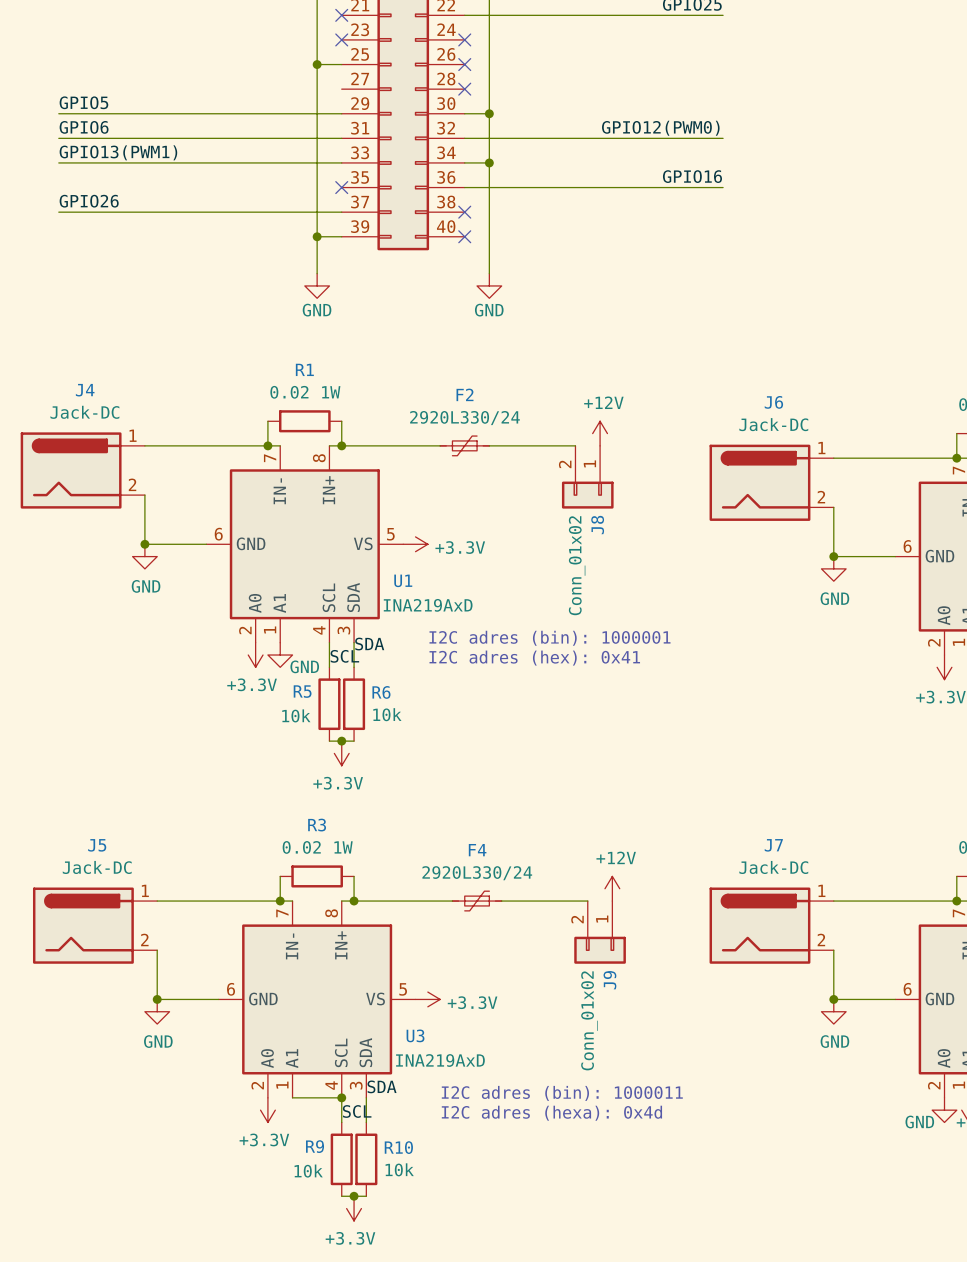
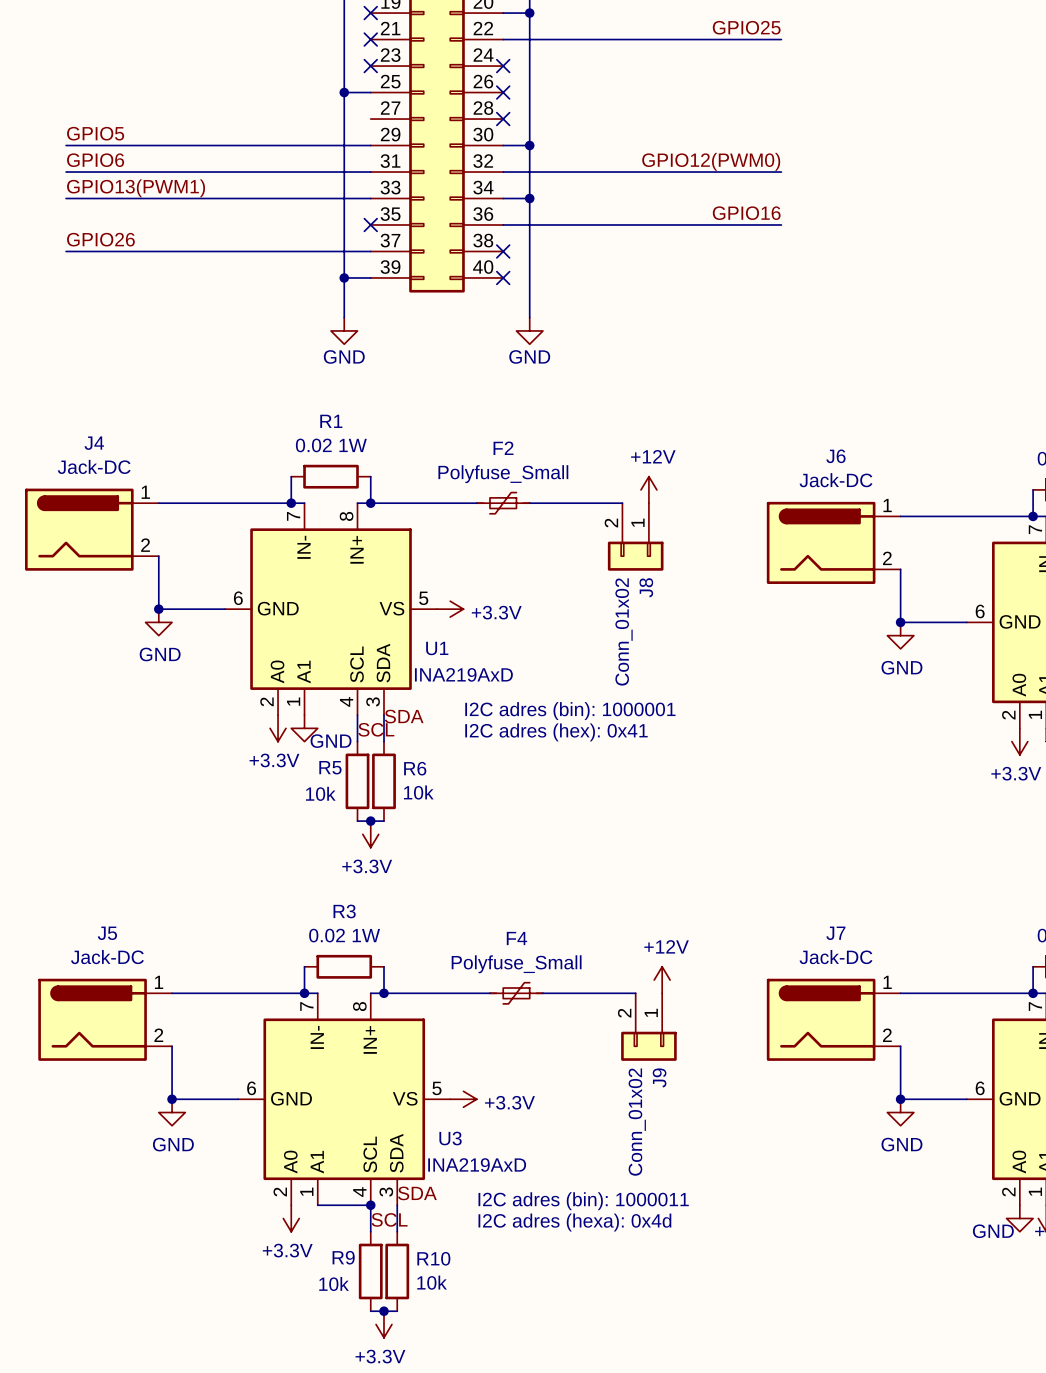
F2 value: 2920L330/24 (464, 418) -> Polyfuse_Small (503, 474)
F4 value: 2920L330/24 (477, 873) -> Polyfuse_Small (516, 964)

